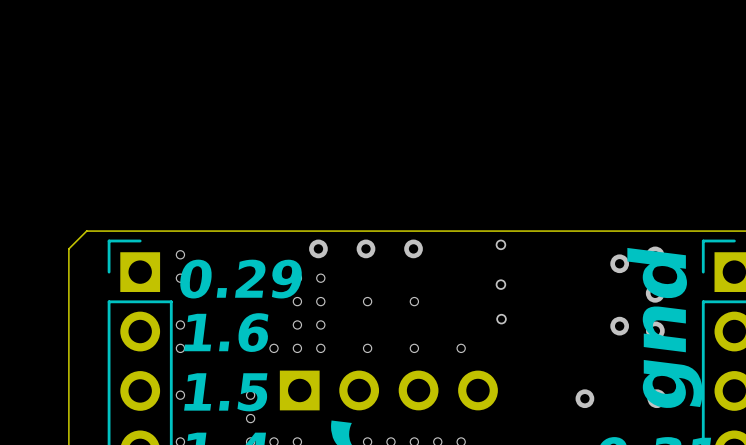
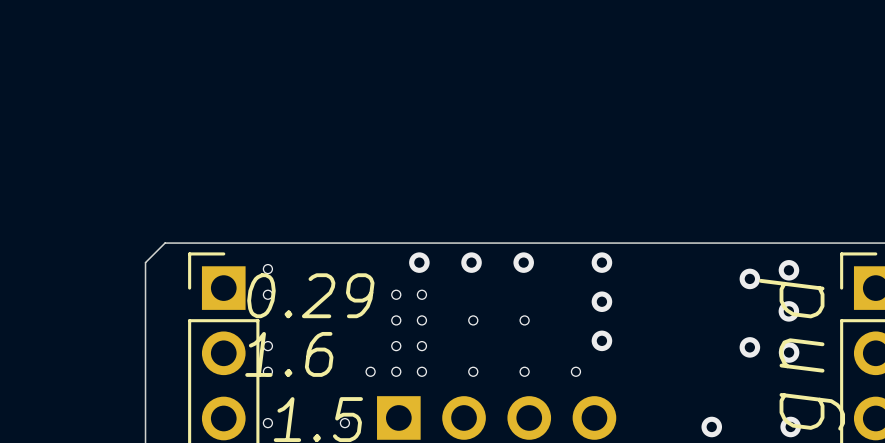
via: (500, 244) -> none
via: none -> (601, 262)
text position: 0.29 (241, 279) -> 0.29 (310, 295)
via: none -> (601, 301)
via: (500, 284) -> none
via: (501, 319) -> none
via: none -> (601, 340)
text position: 1.6 (226, 332) -> 1.6 (289, 354)

